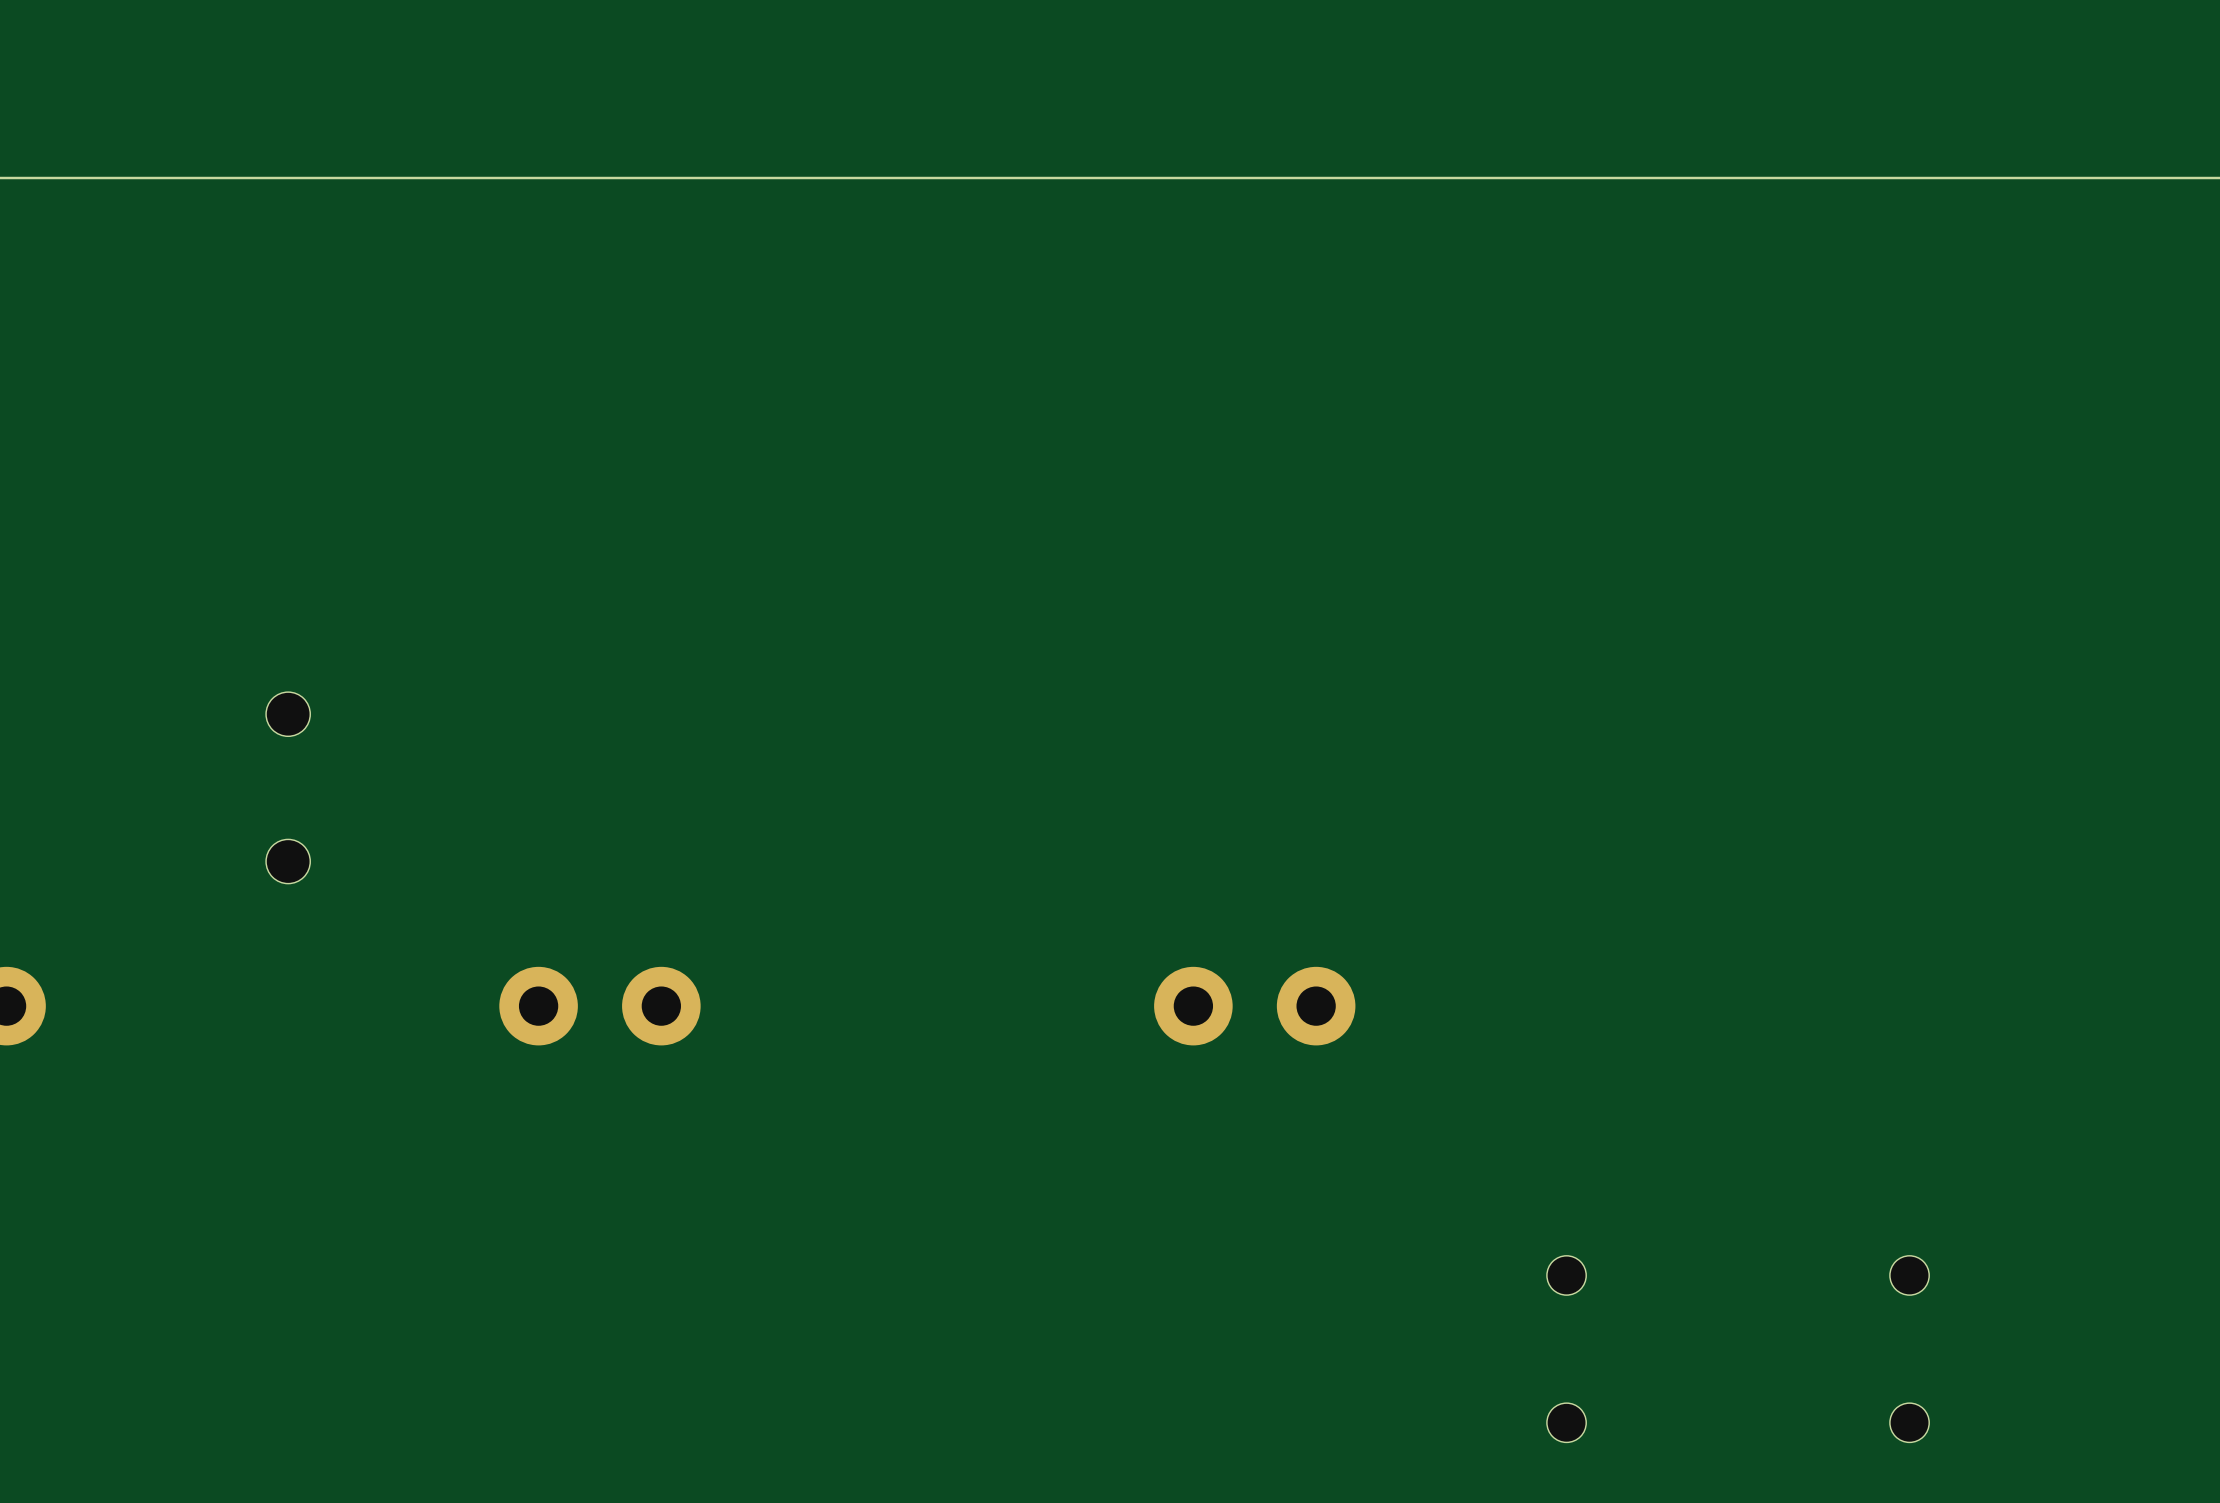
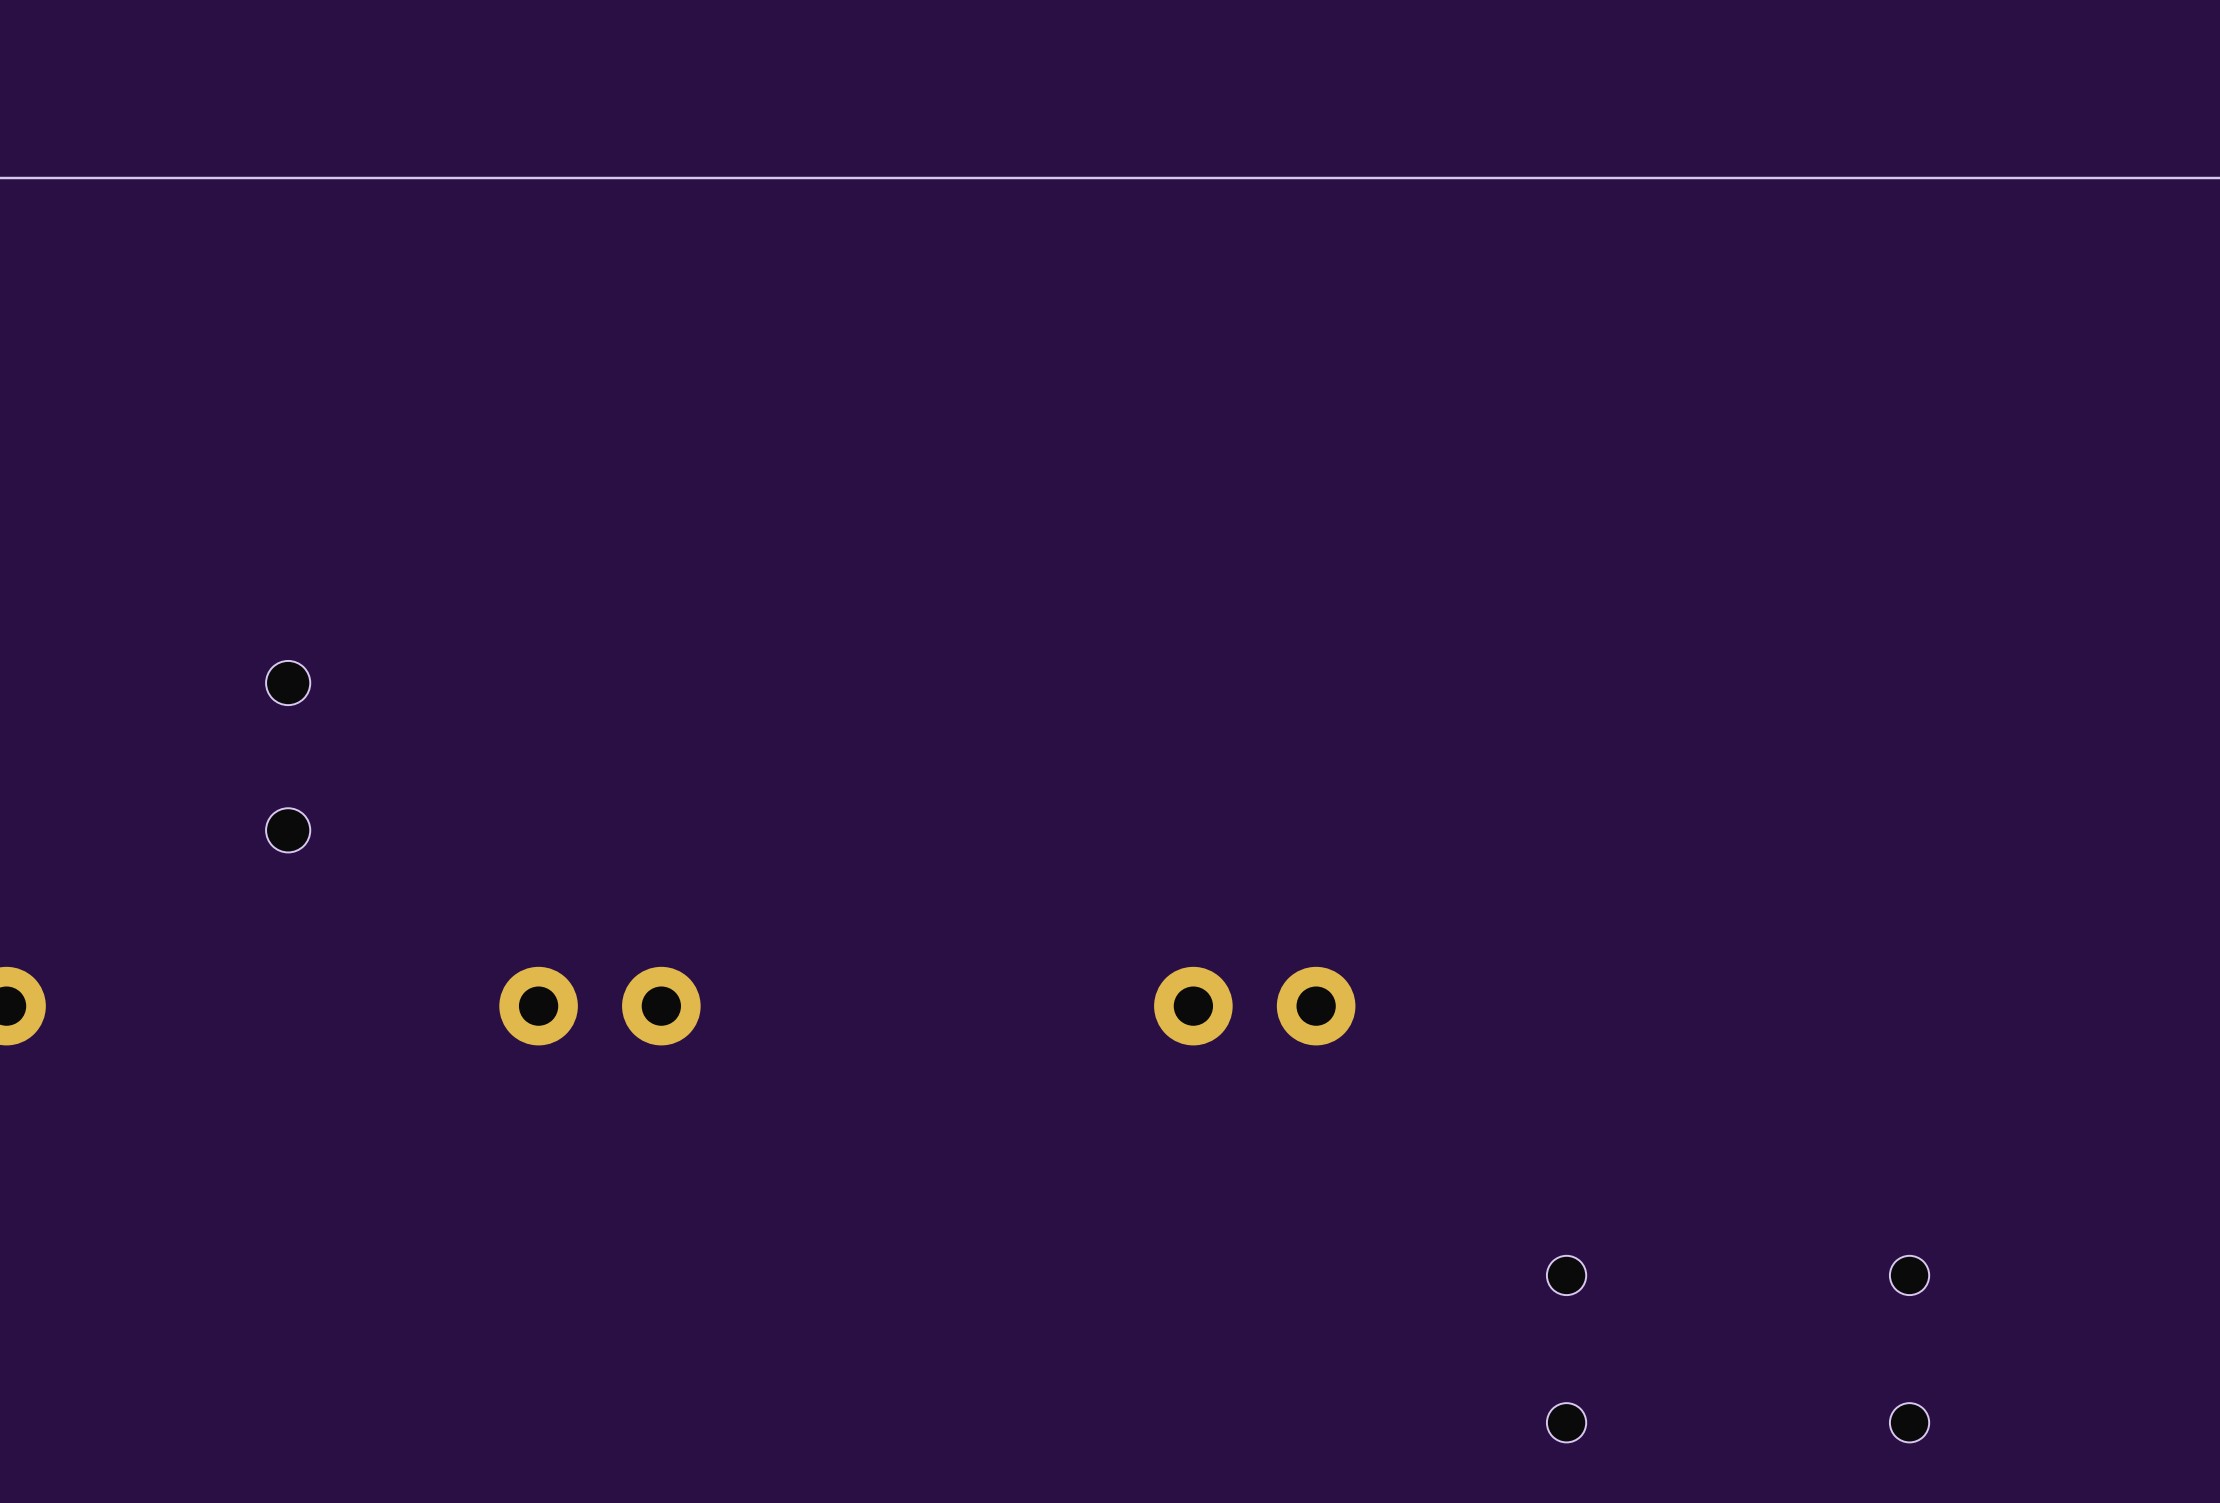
part position: (288, 787) -> (288, 756)

